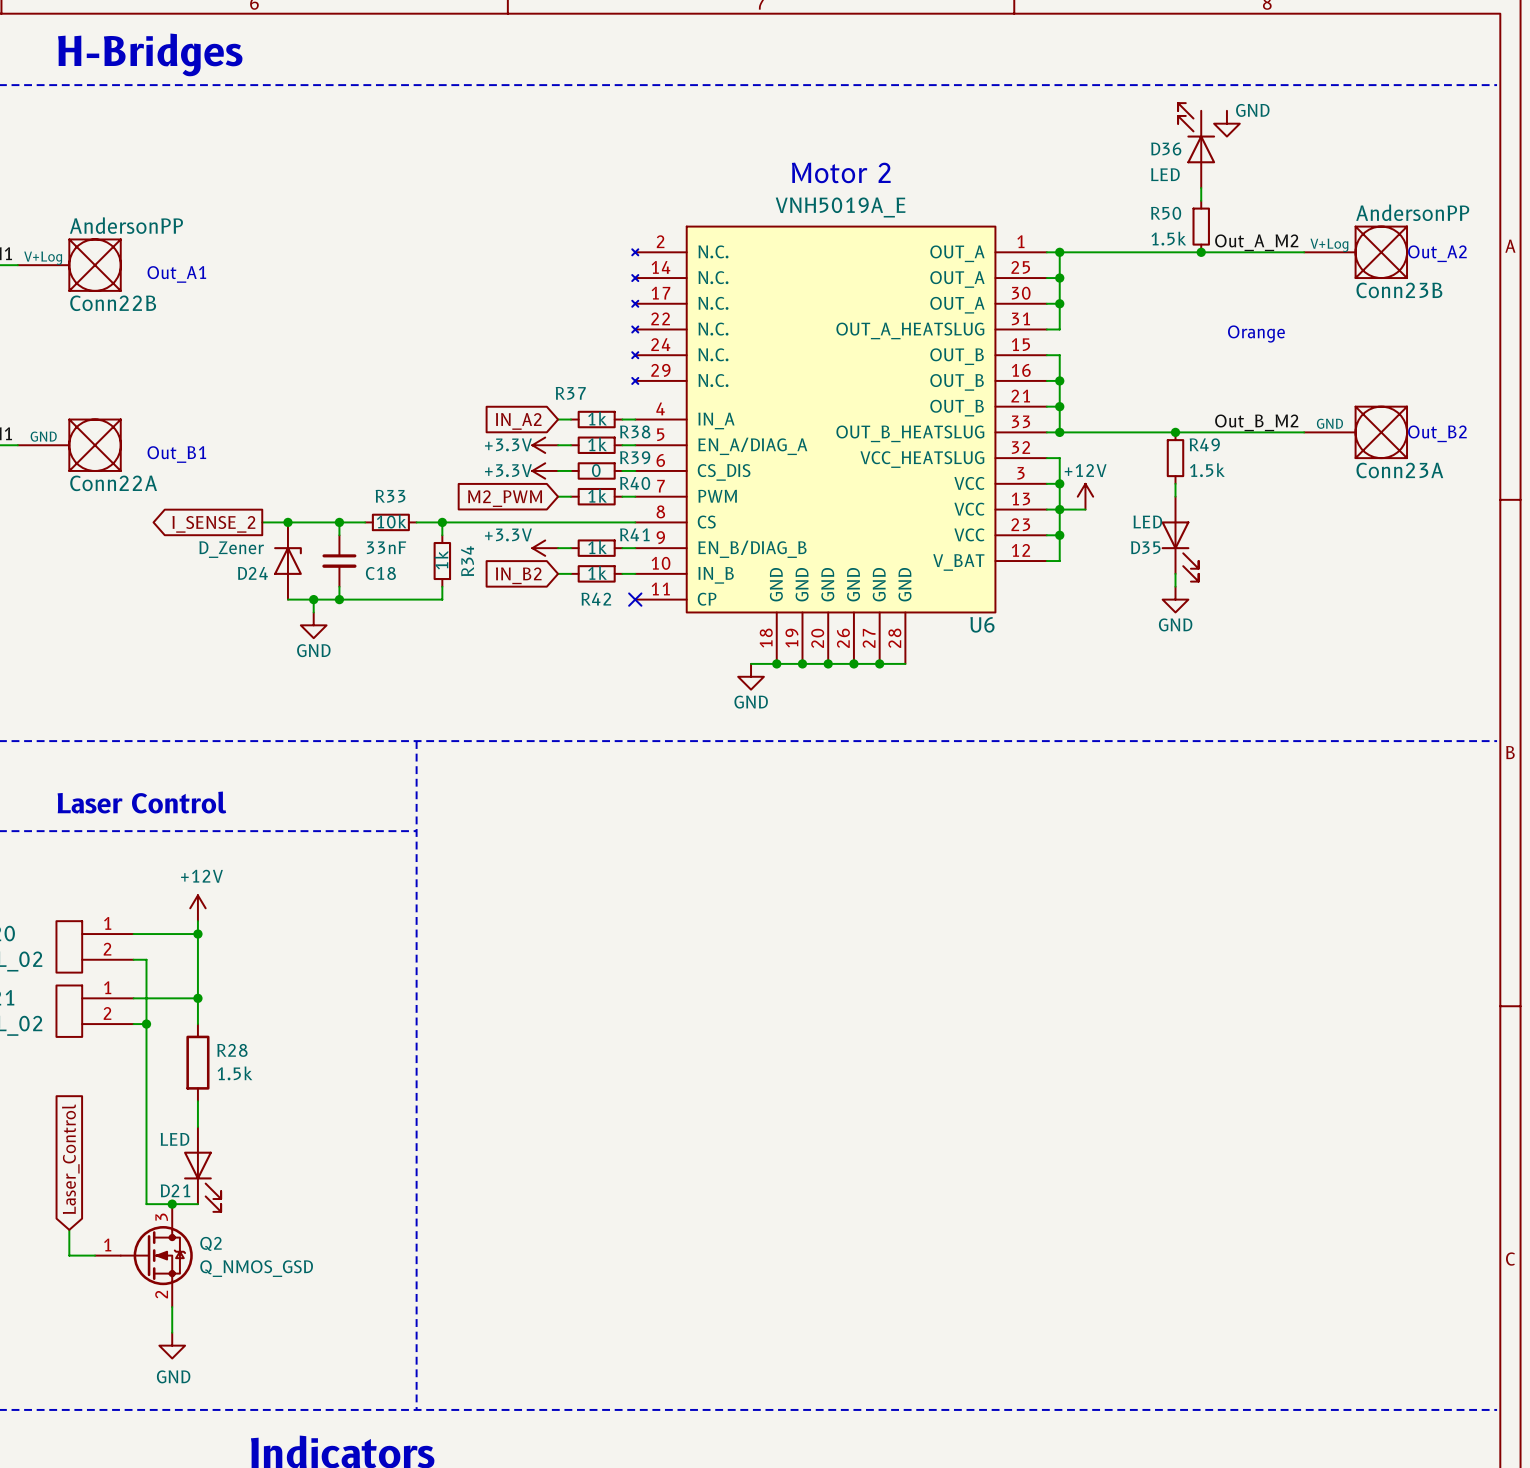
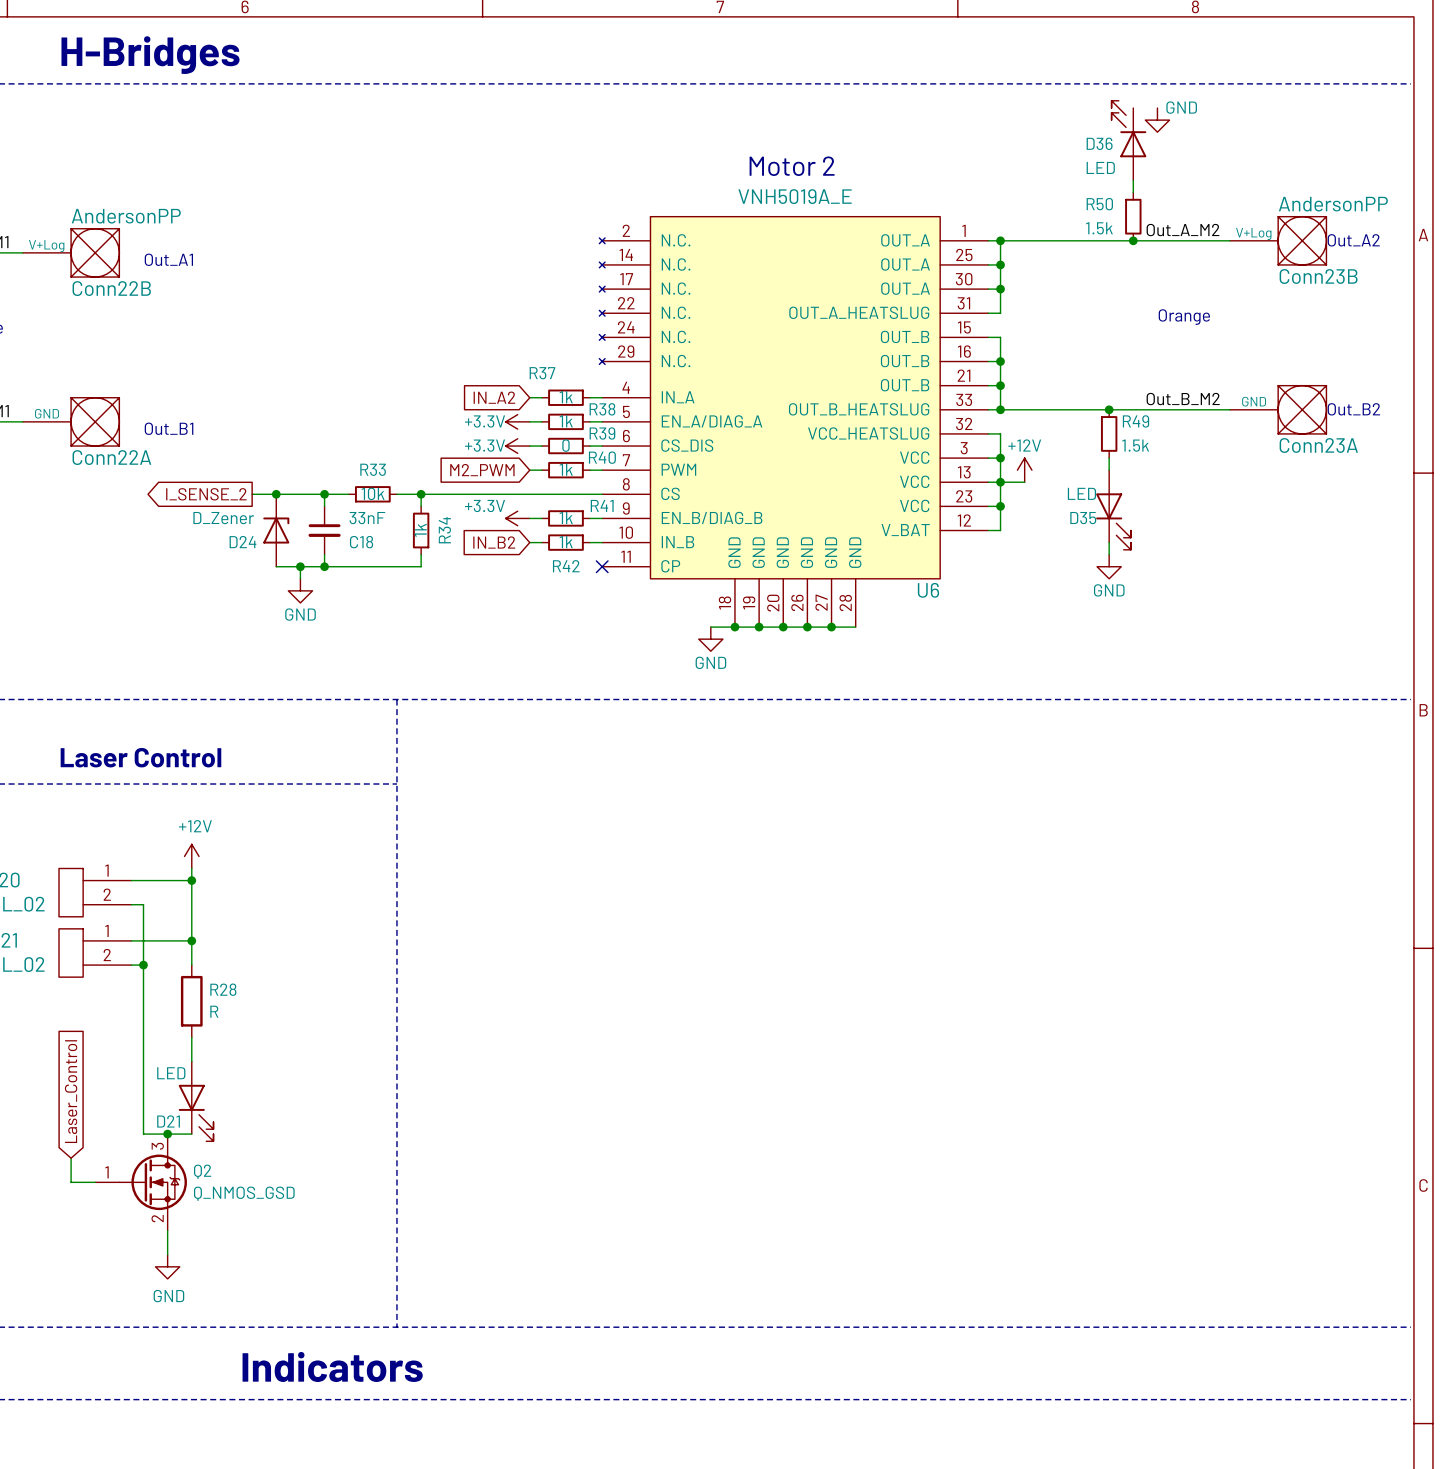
R28 value: 1.5k (234, 1073) -> R (214, 1011)

